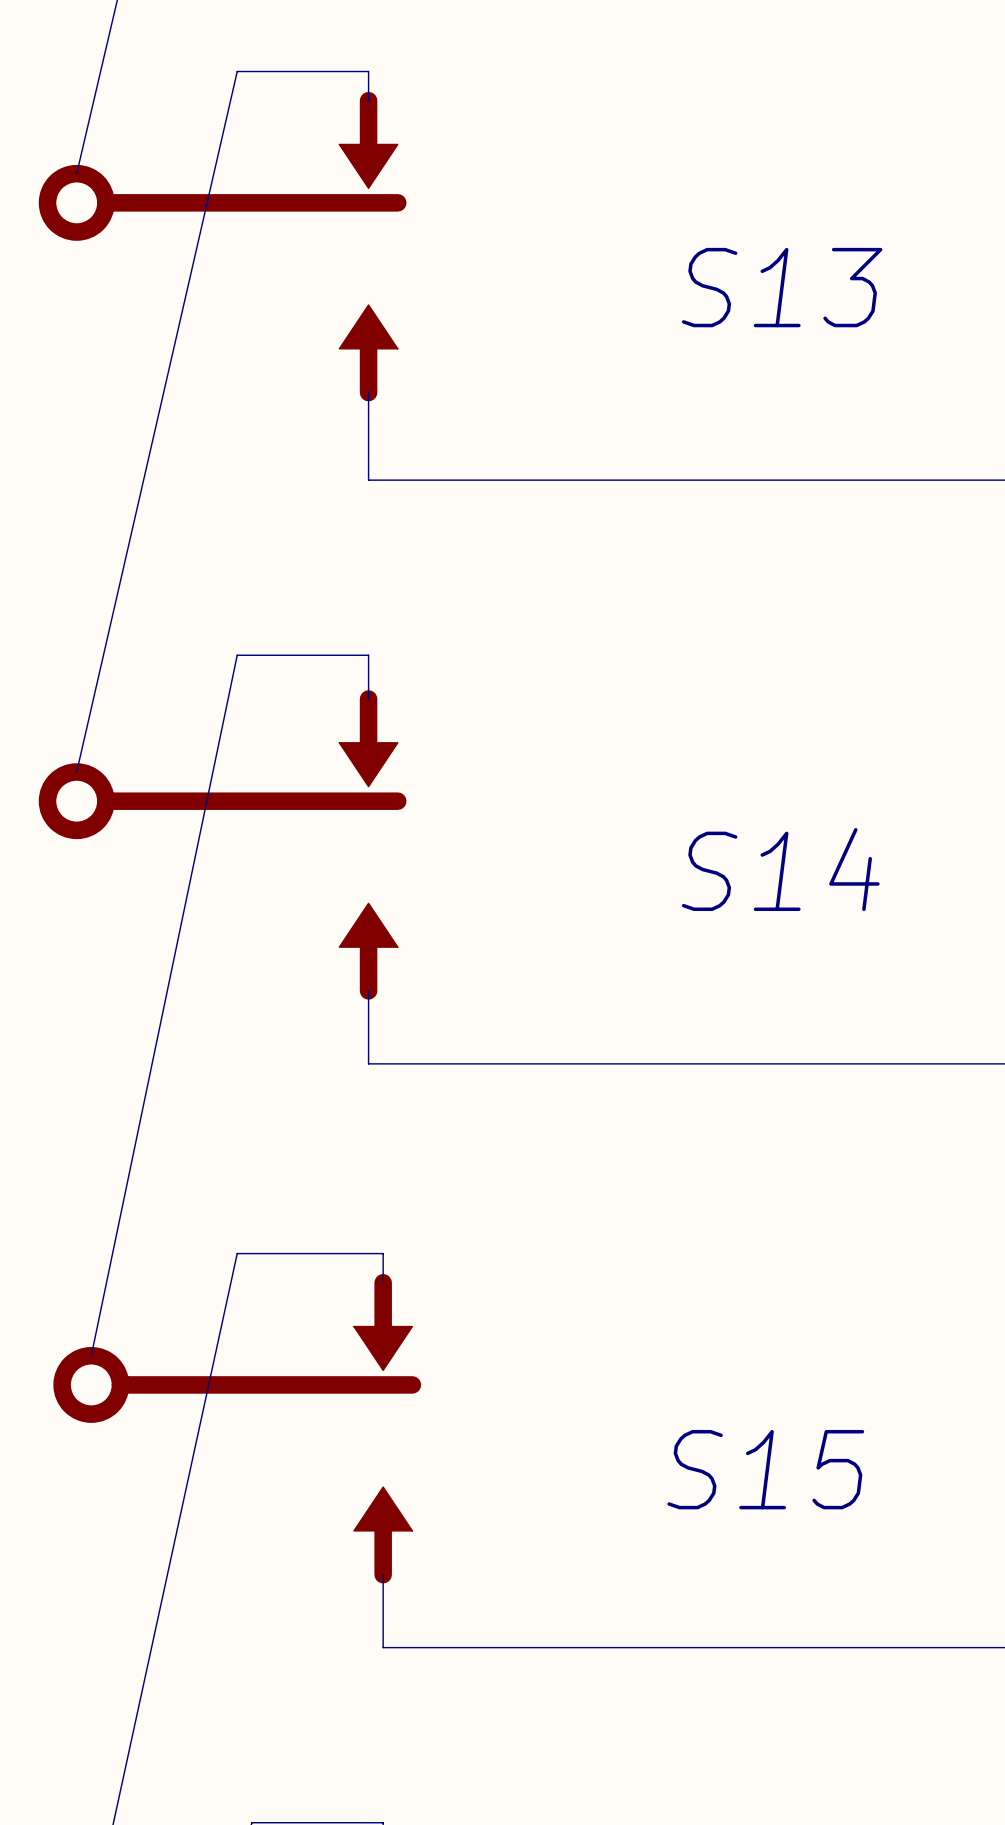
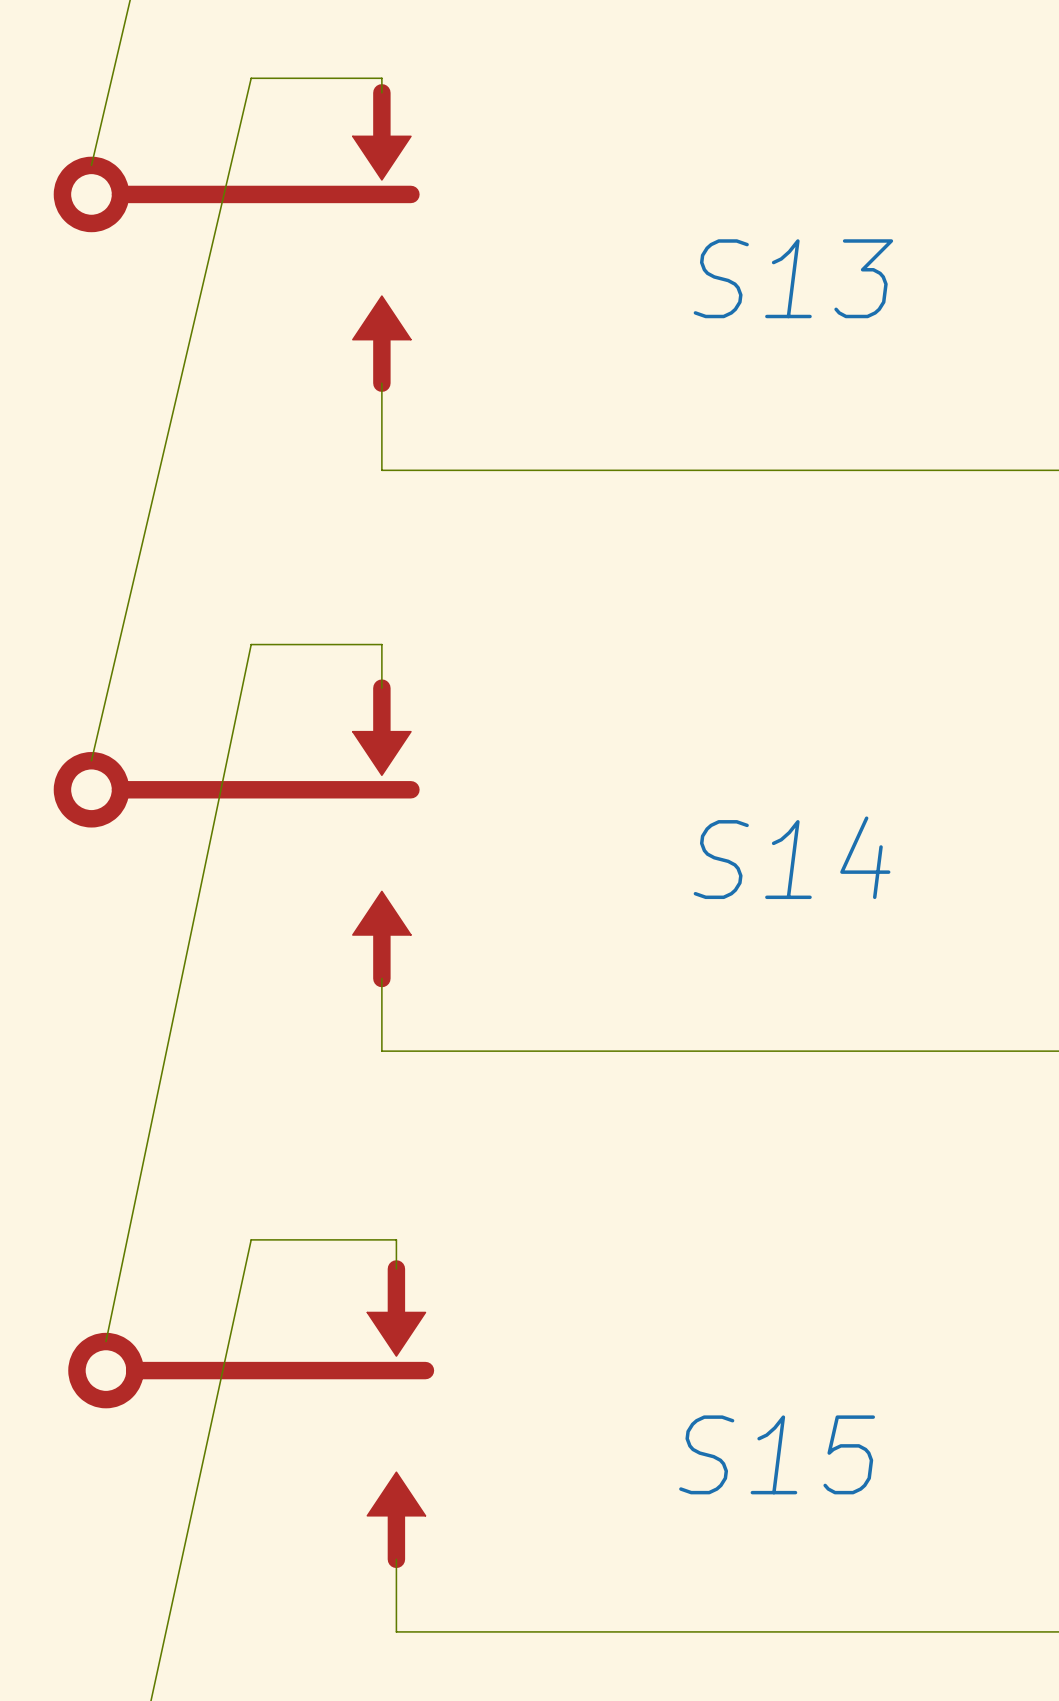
wire: (368, 86) (368, 71) (237, 71) (76, 772) -> (381, 78) (251, 78) (91, 760)

